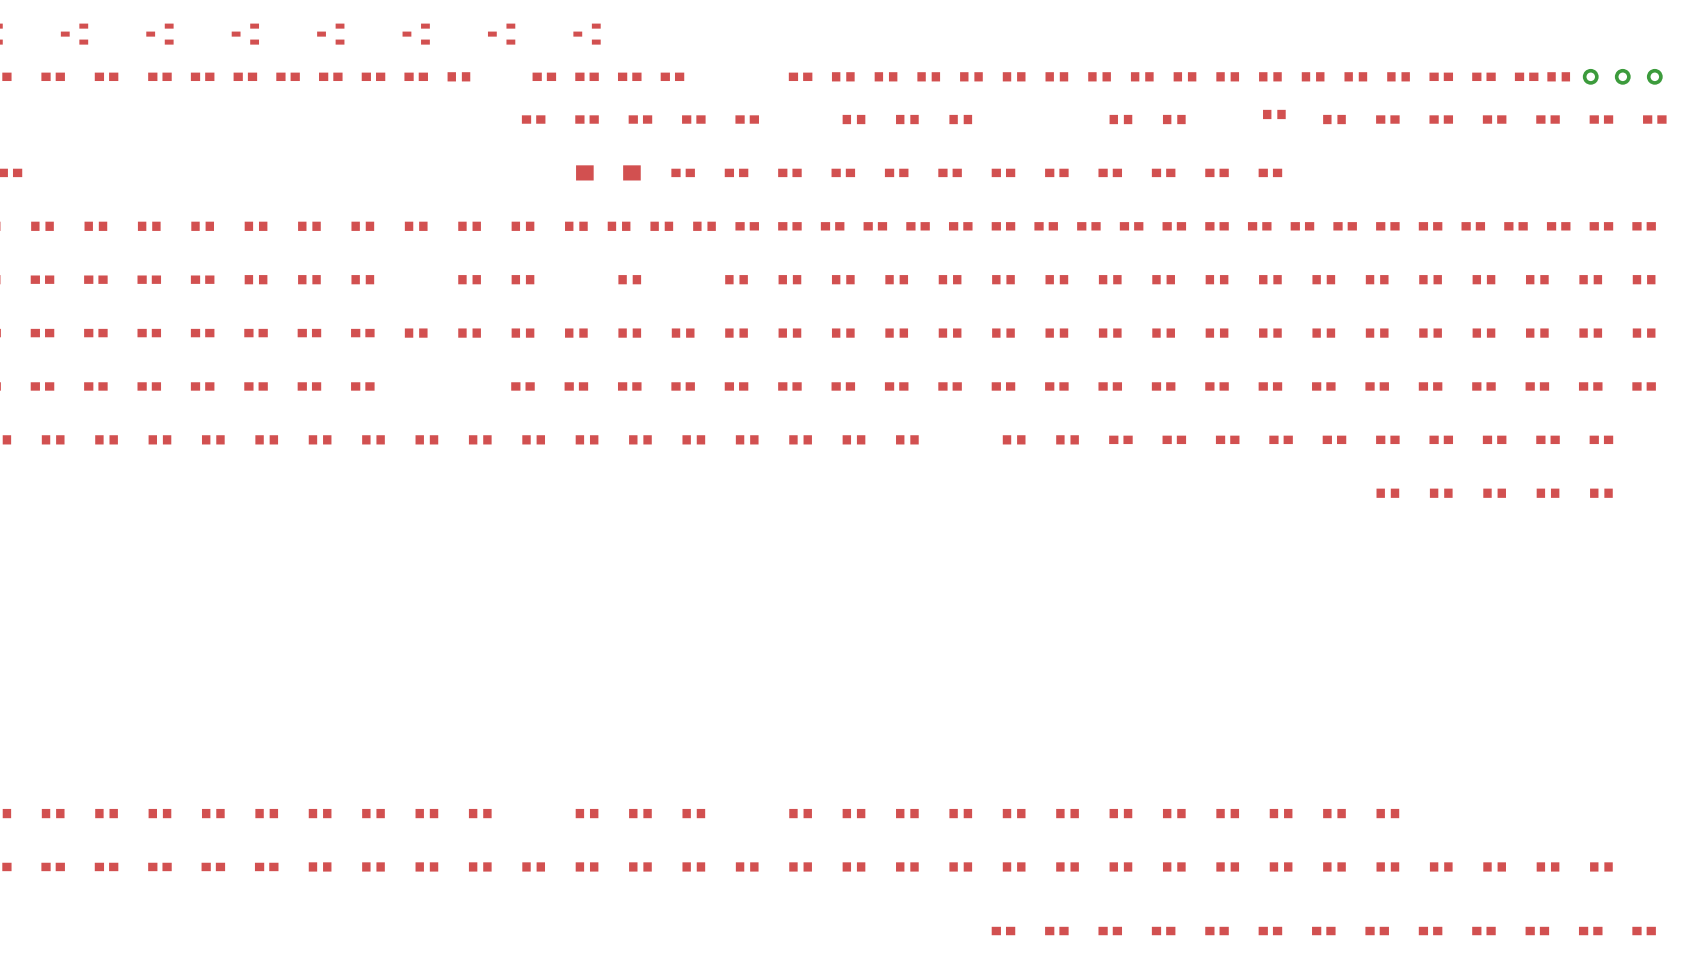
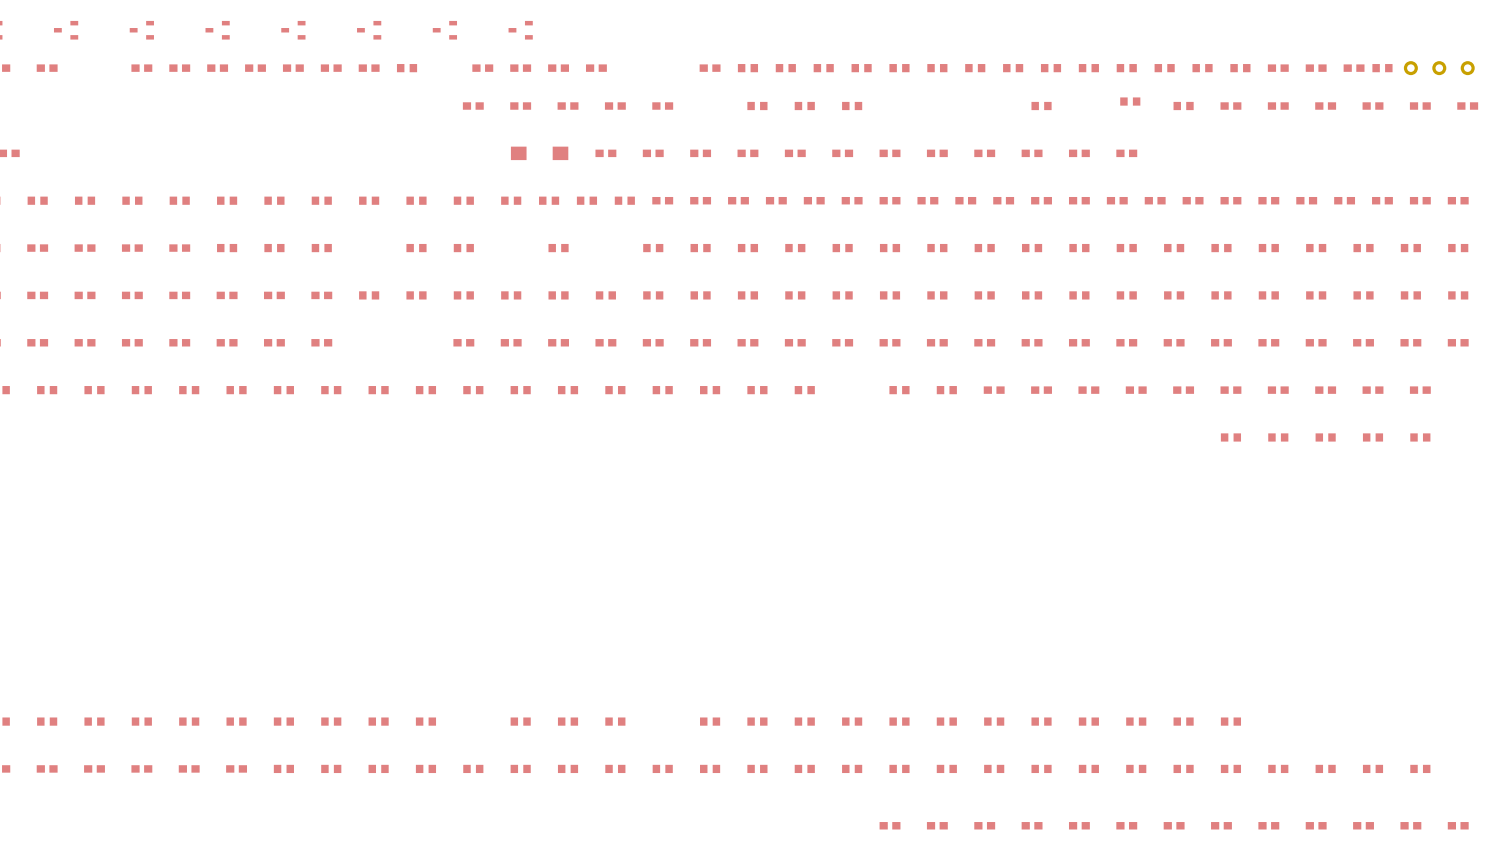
part: (106, 76) -> none
part: (1120, 119) -> none

